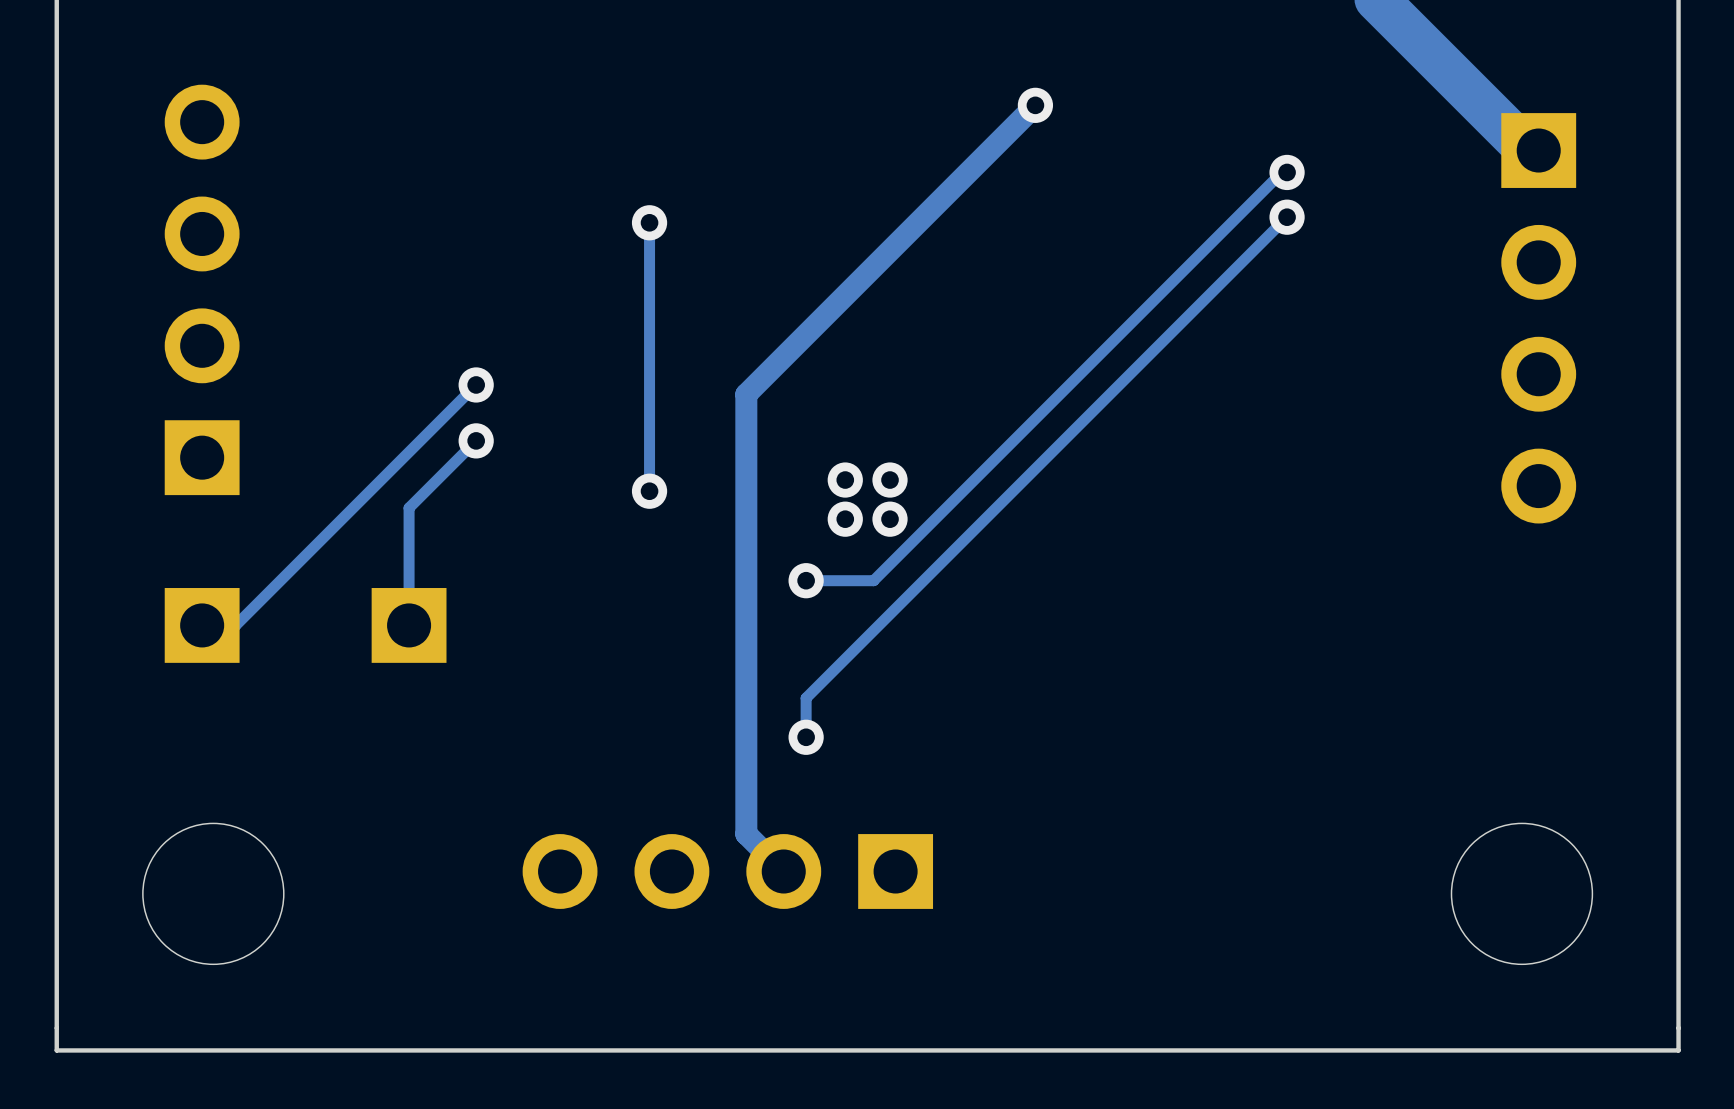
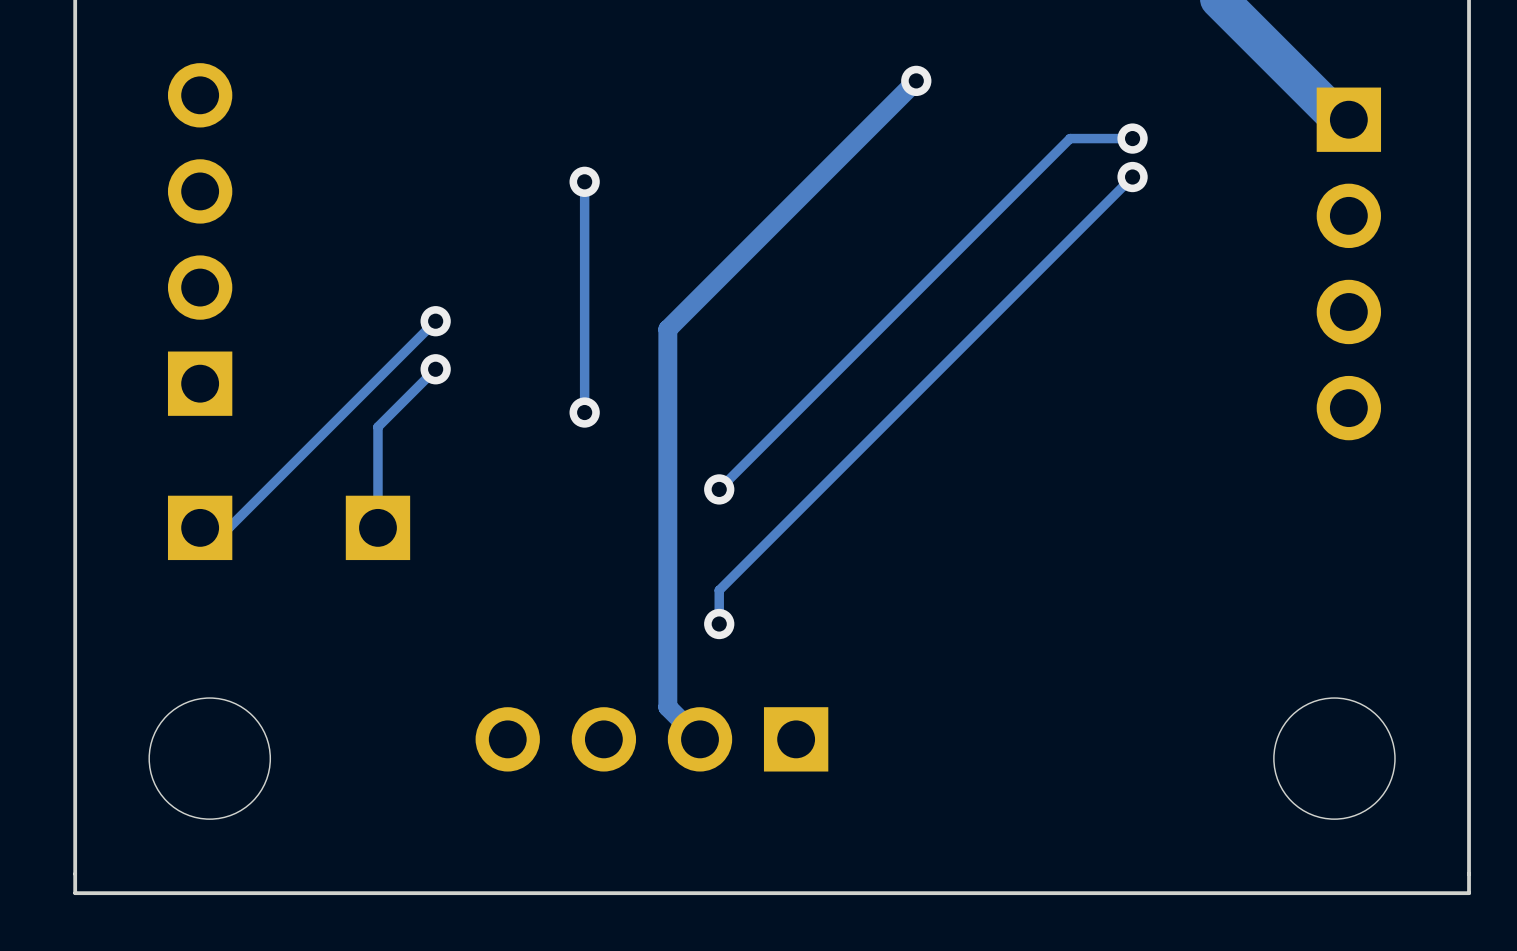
track: (1281, 172) (873, 580) (811, 580) -> (1128, 138) (1070, 138) (719, 489)
via: (845, 480) -> none
via: (890, 480) -> none
via: (845, 519) -> none
via: (890, 519) -> none

